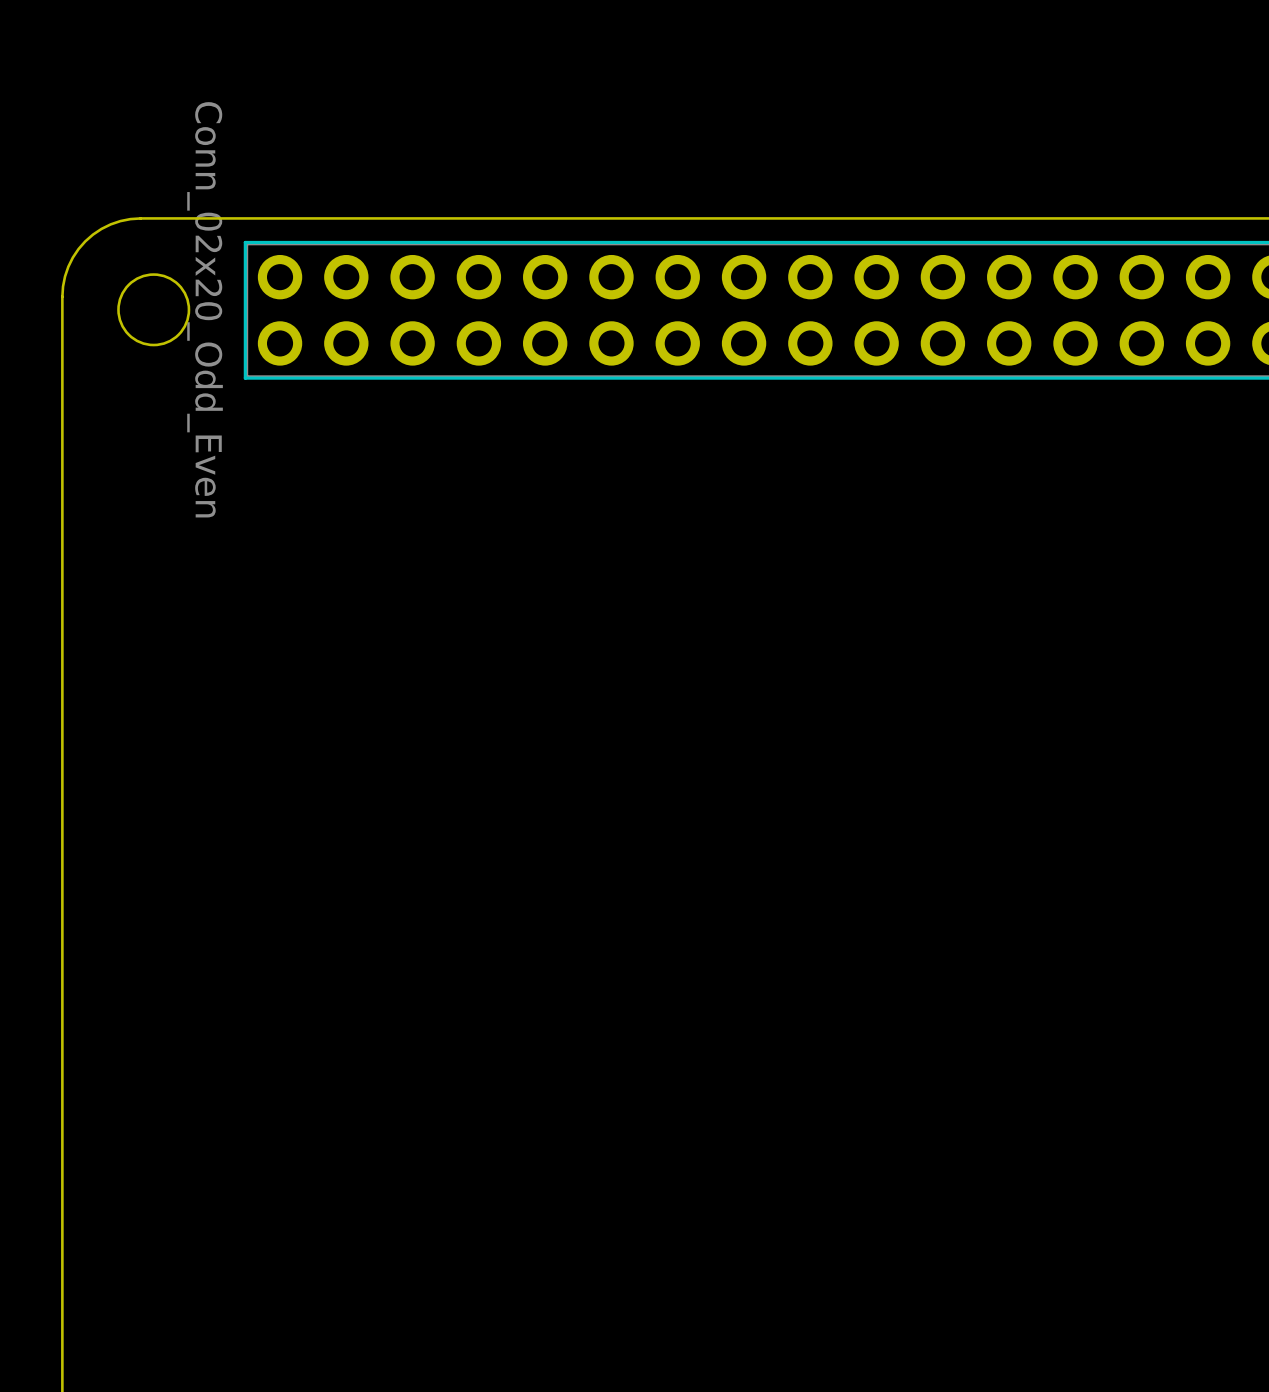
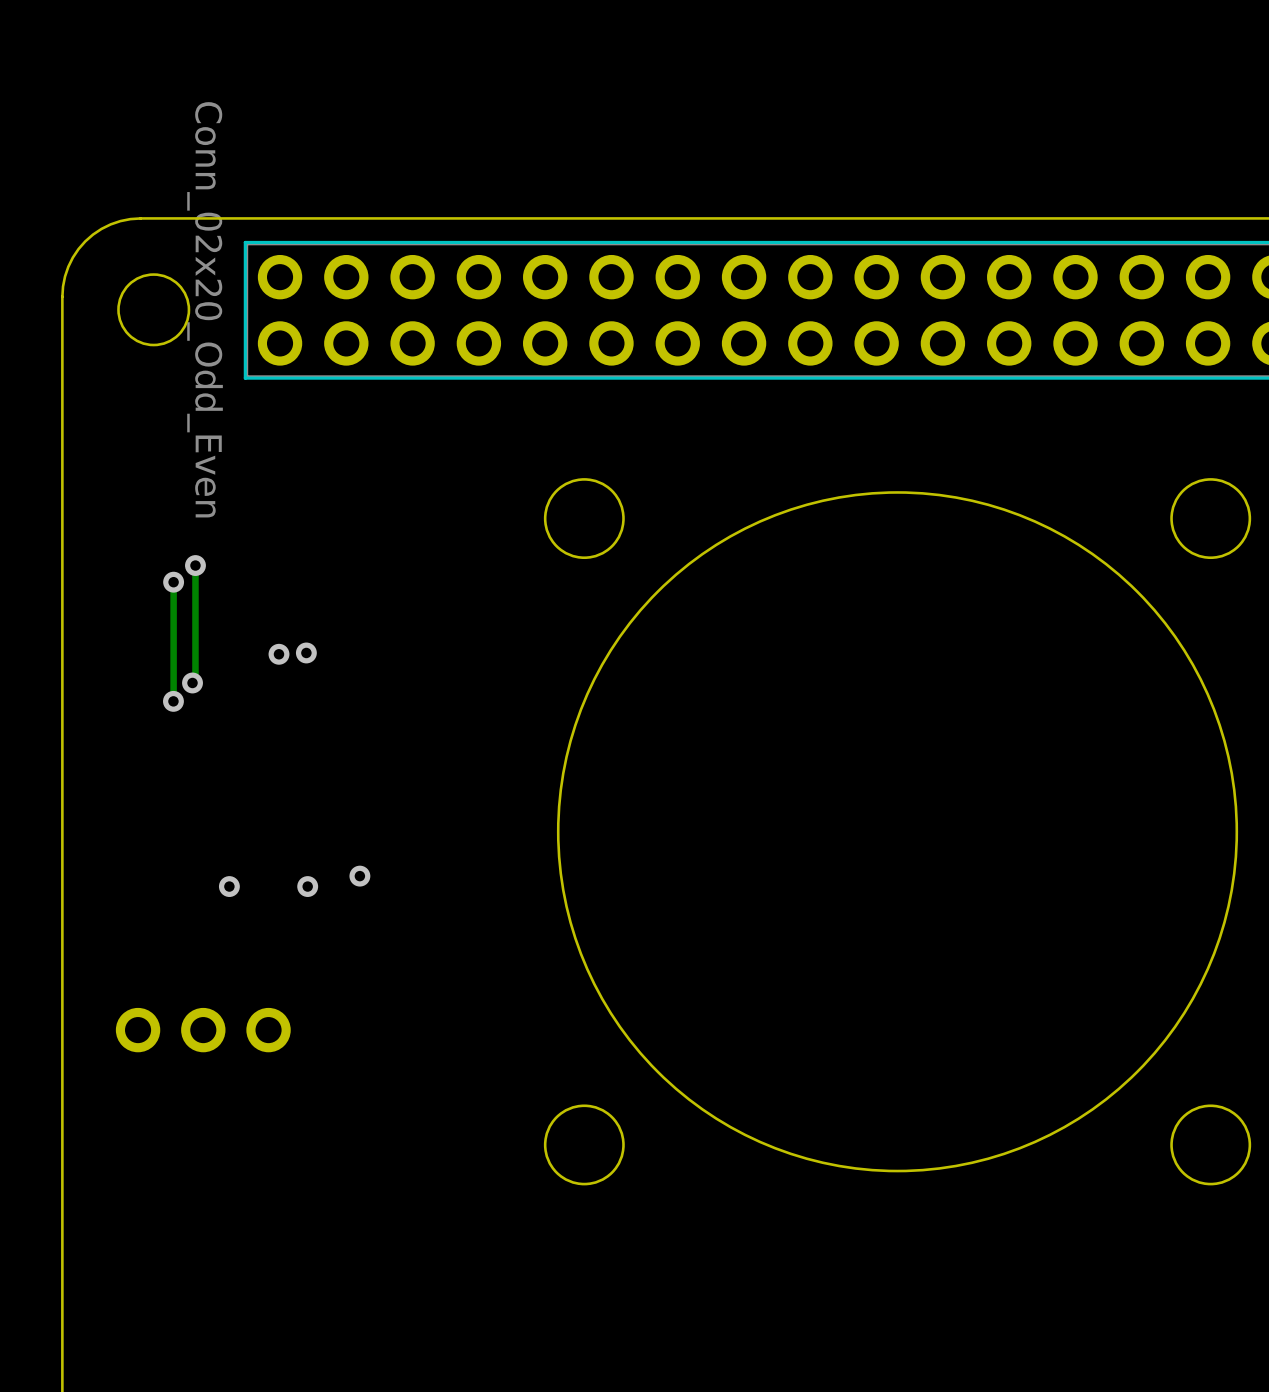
round board edge: none -> [543, 478, 625, 560]
round board edge: none -> [1170, 478, 1252, 560]
round board edge: none -> [556, 491, 1239, 1173]
track: none -> (195, 565) (195, 680) (192, 682)
via: none -> (195, 565)
track: none -> (173, 582) (173, 701)
via: none -> (173, 582)
via: none -> (306, 652)
via: none -> (278, 654)
via: none -> (192, 682)
via: none -> (173, 701)
via: none -> (359, 876)
via: none -> (229, 886)
via: none -> (307, 886)
part: none -> (203, 1030)
round board edge: none -> [543, 1104, 625, 1186]
round board edge: none -> [1170, 1104, 1252, 1186]

